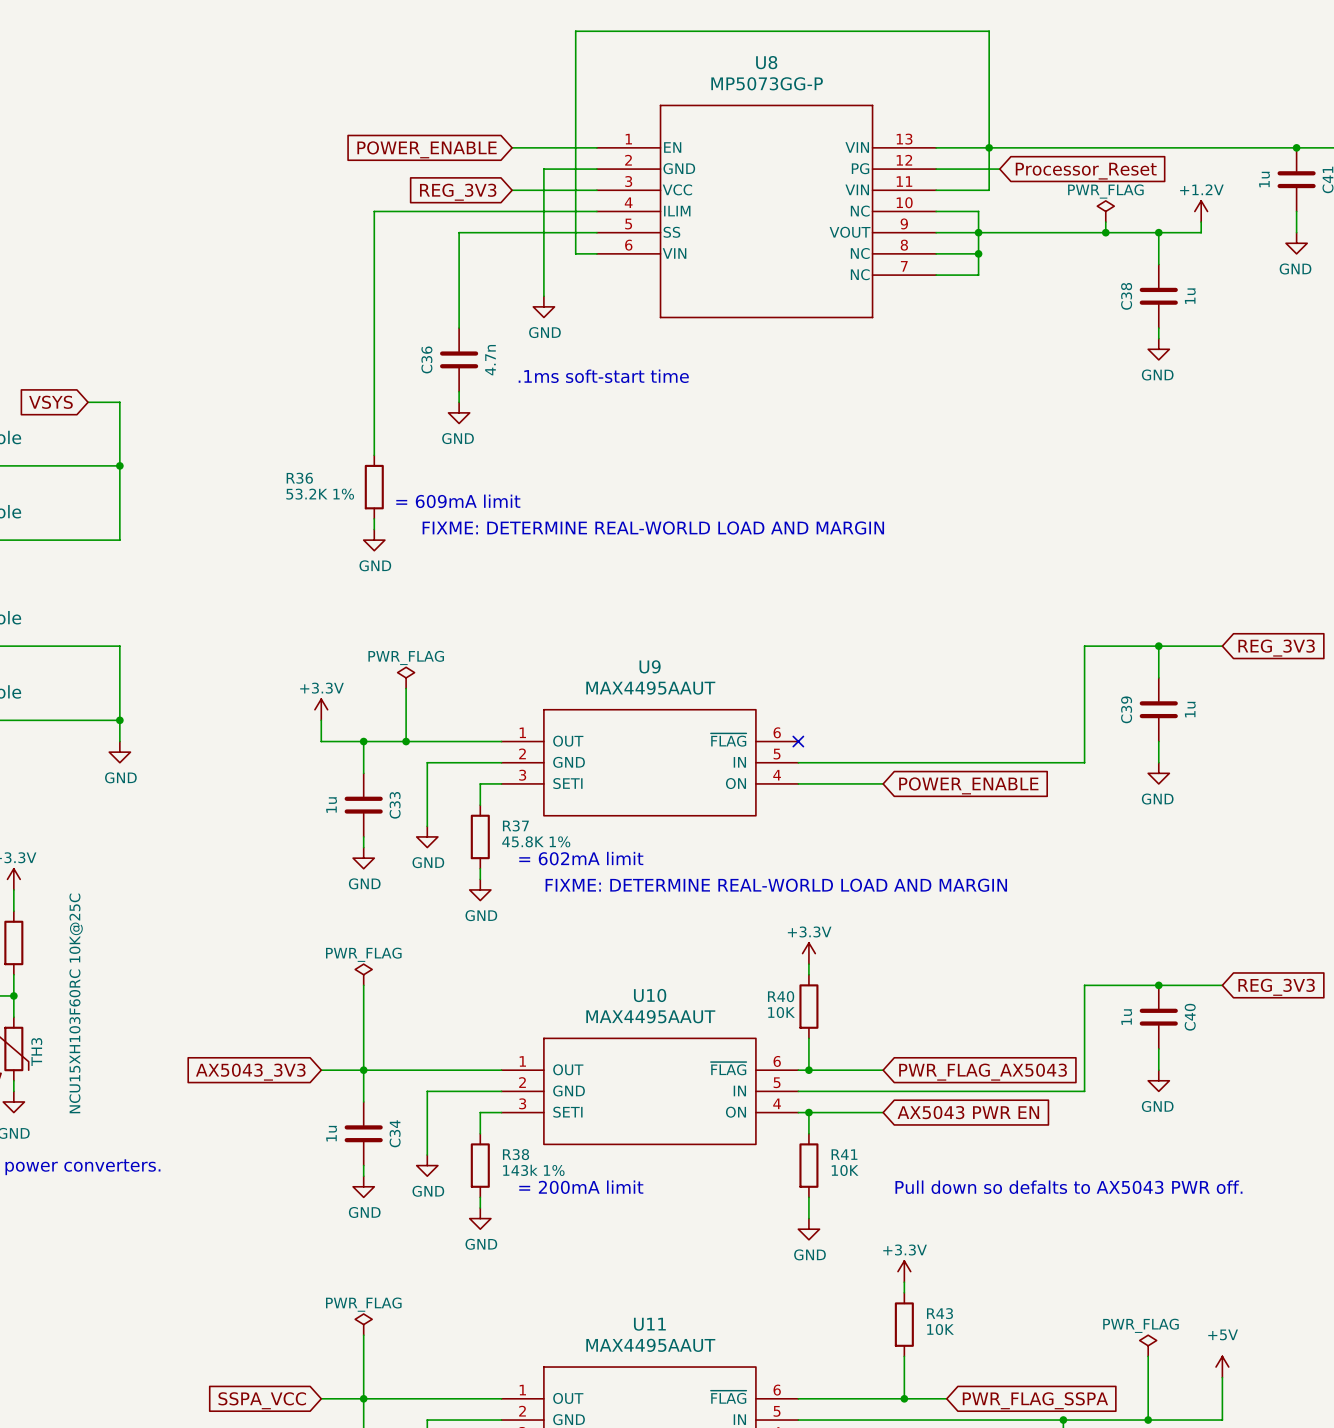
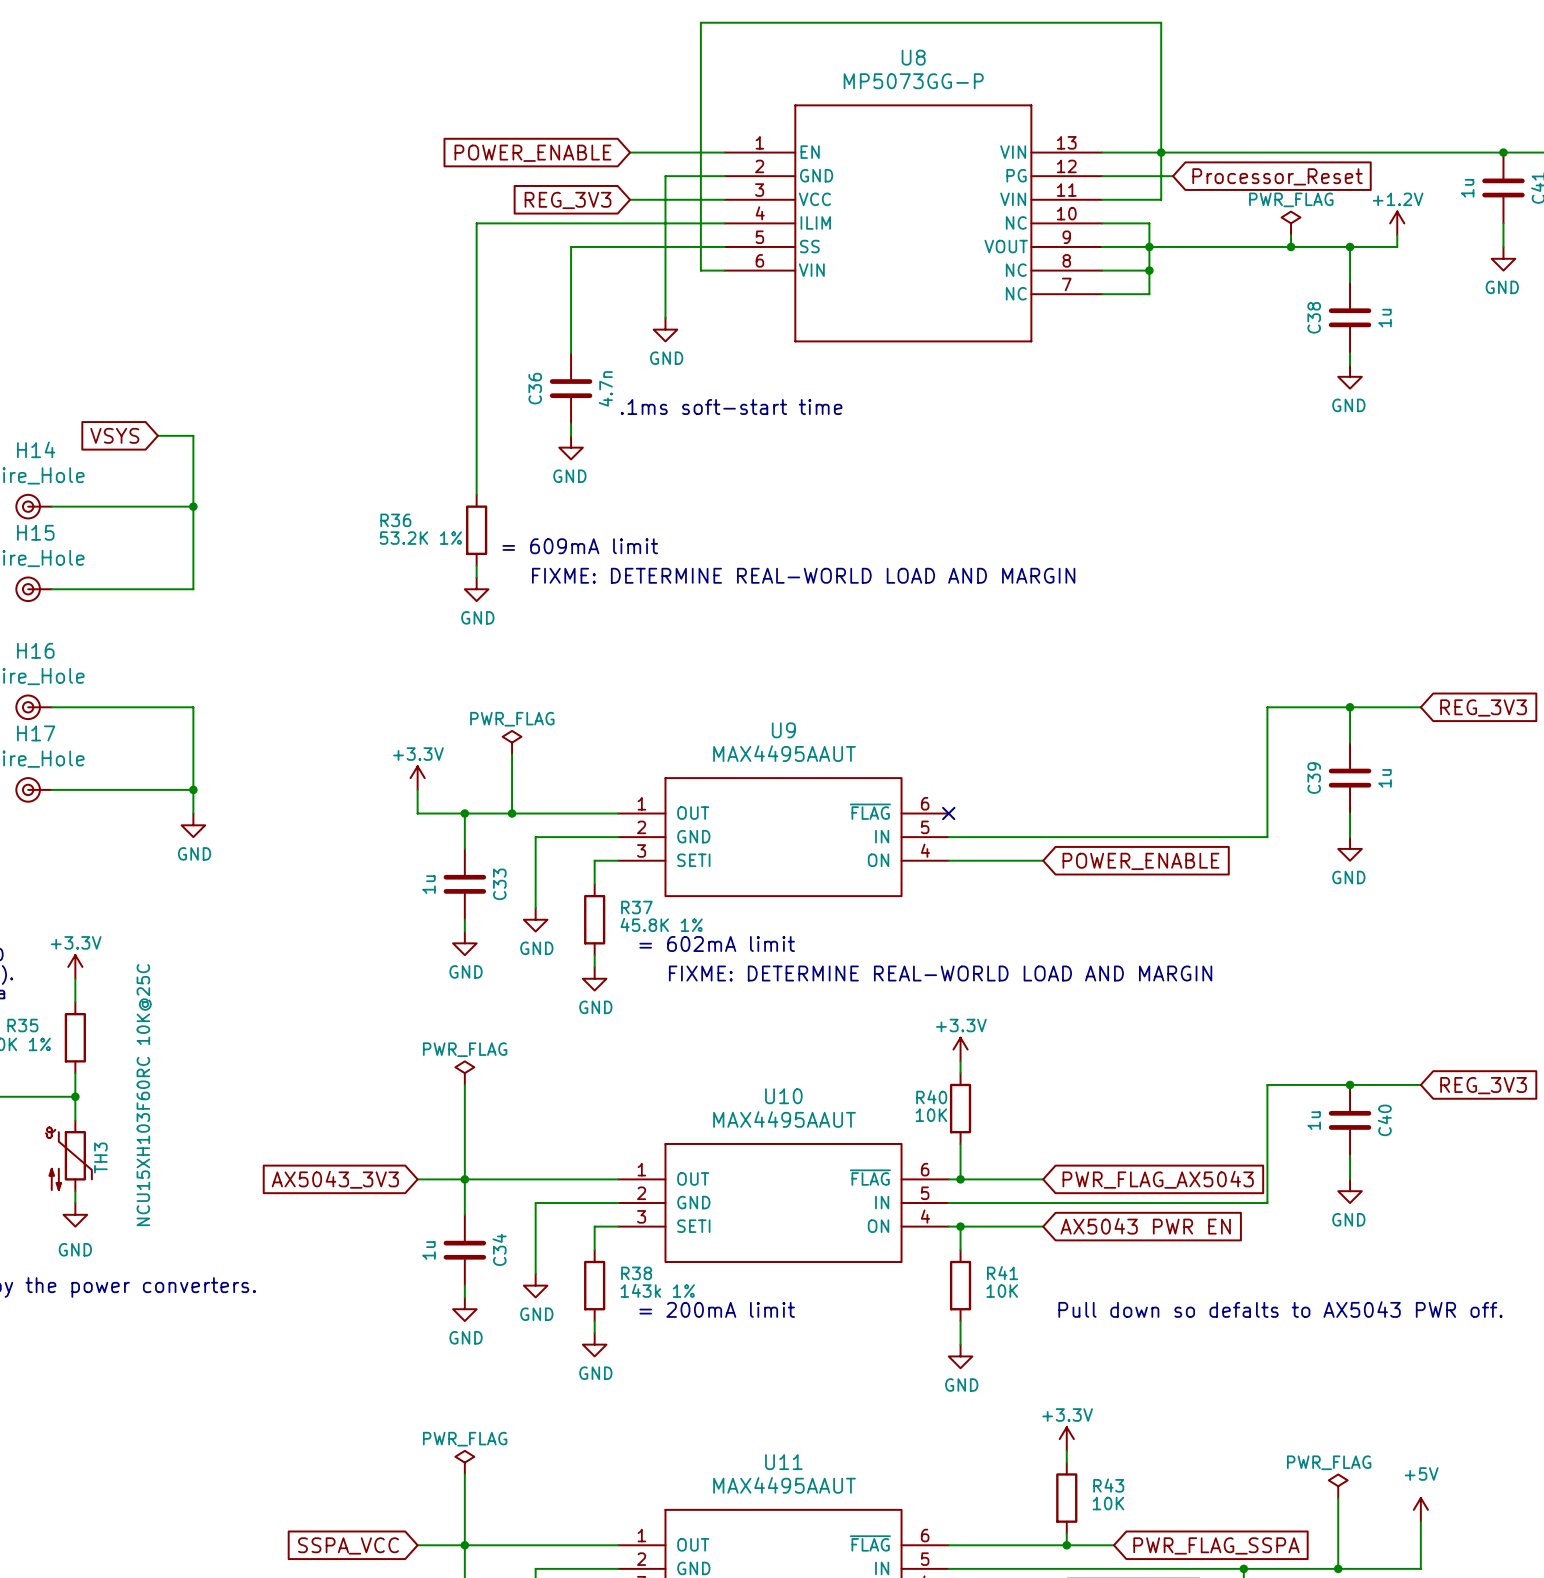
power symbol position: +3.3V (904, 1271) -> +3.3V (1066, 1439)
wire: (904, 1282) (904, 1292) -> (1066, 1450) (1066, 1462)
R43 position: (904, 1324) -> (1066, 1498)
wire: (904, 1356) (904, 1388) -> none

